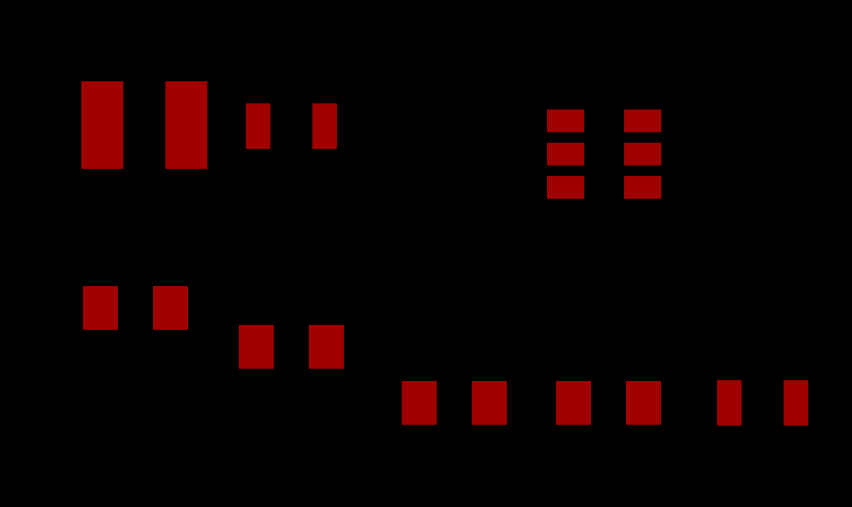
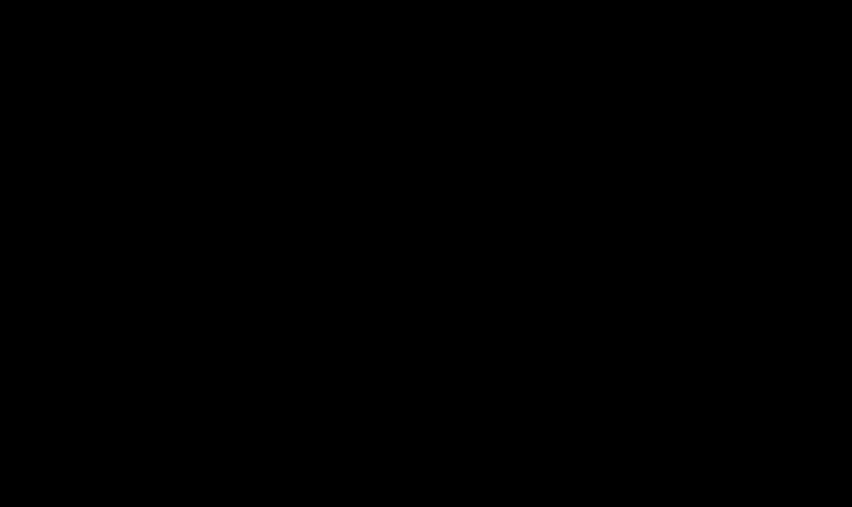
part: (144, 125) -> none
part: (291, 126) -> none
part: (604, 154) -> none
part: (135, 307) -> none
part: (291, 346) -> none
part: (454, 402) -> none
part: (608, 402) -> none
part: (762, 402) -> none

